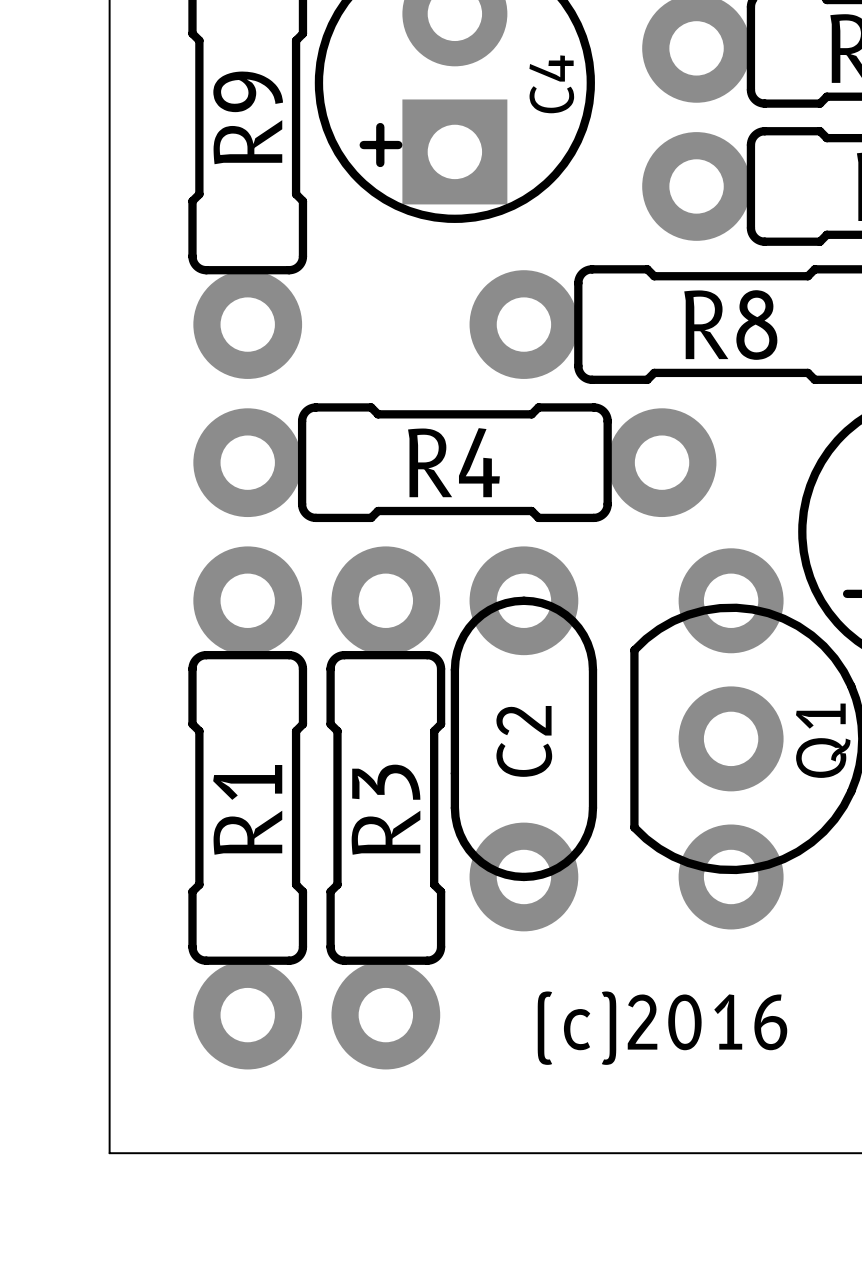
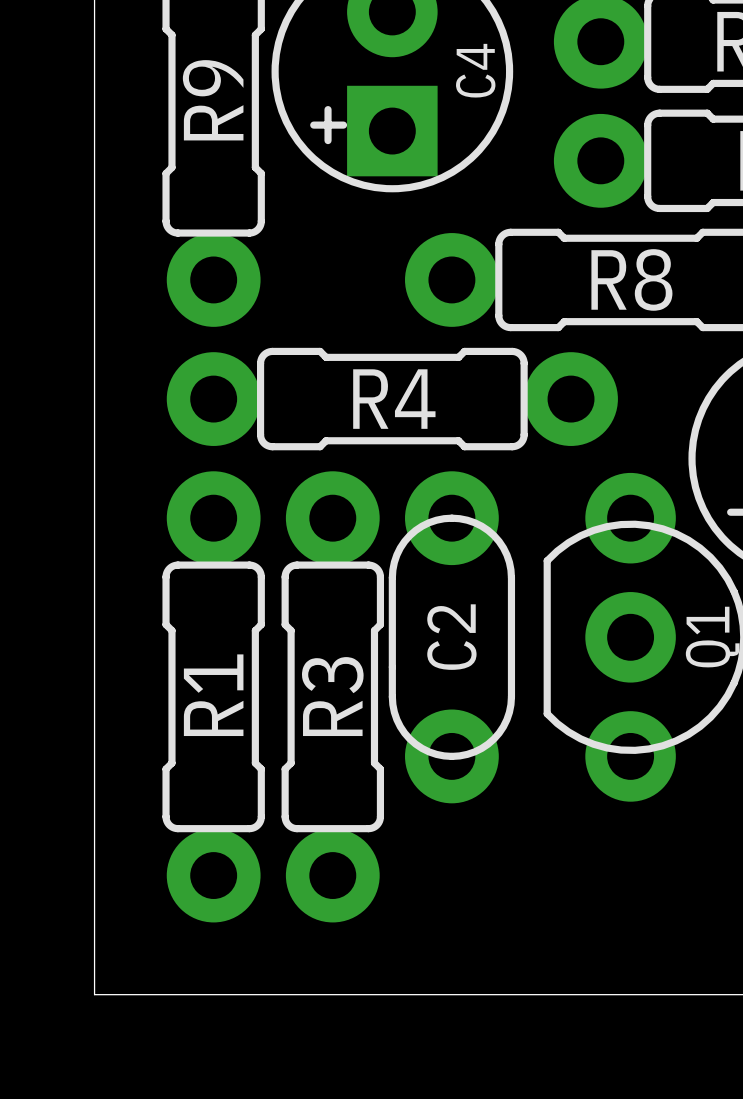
text: (c)2016 (662, 1028) -> none

